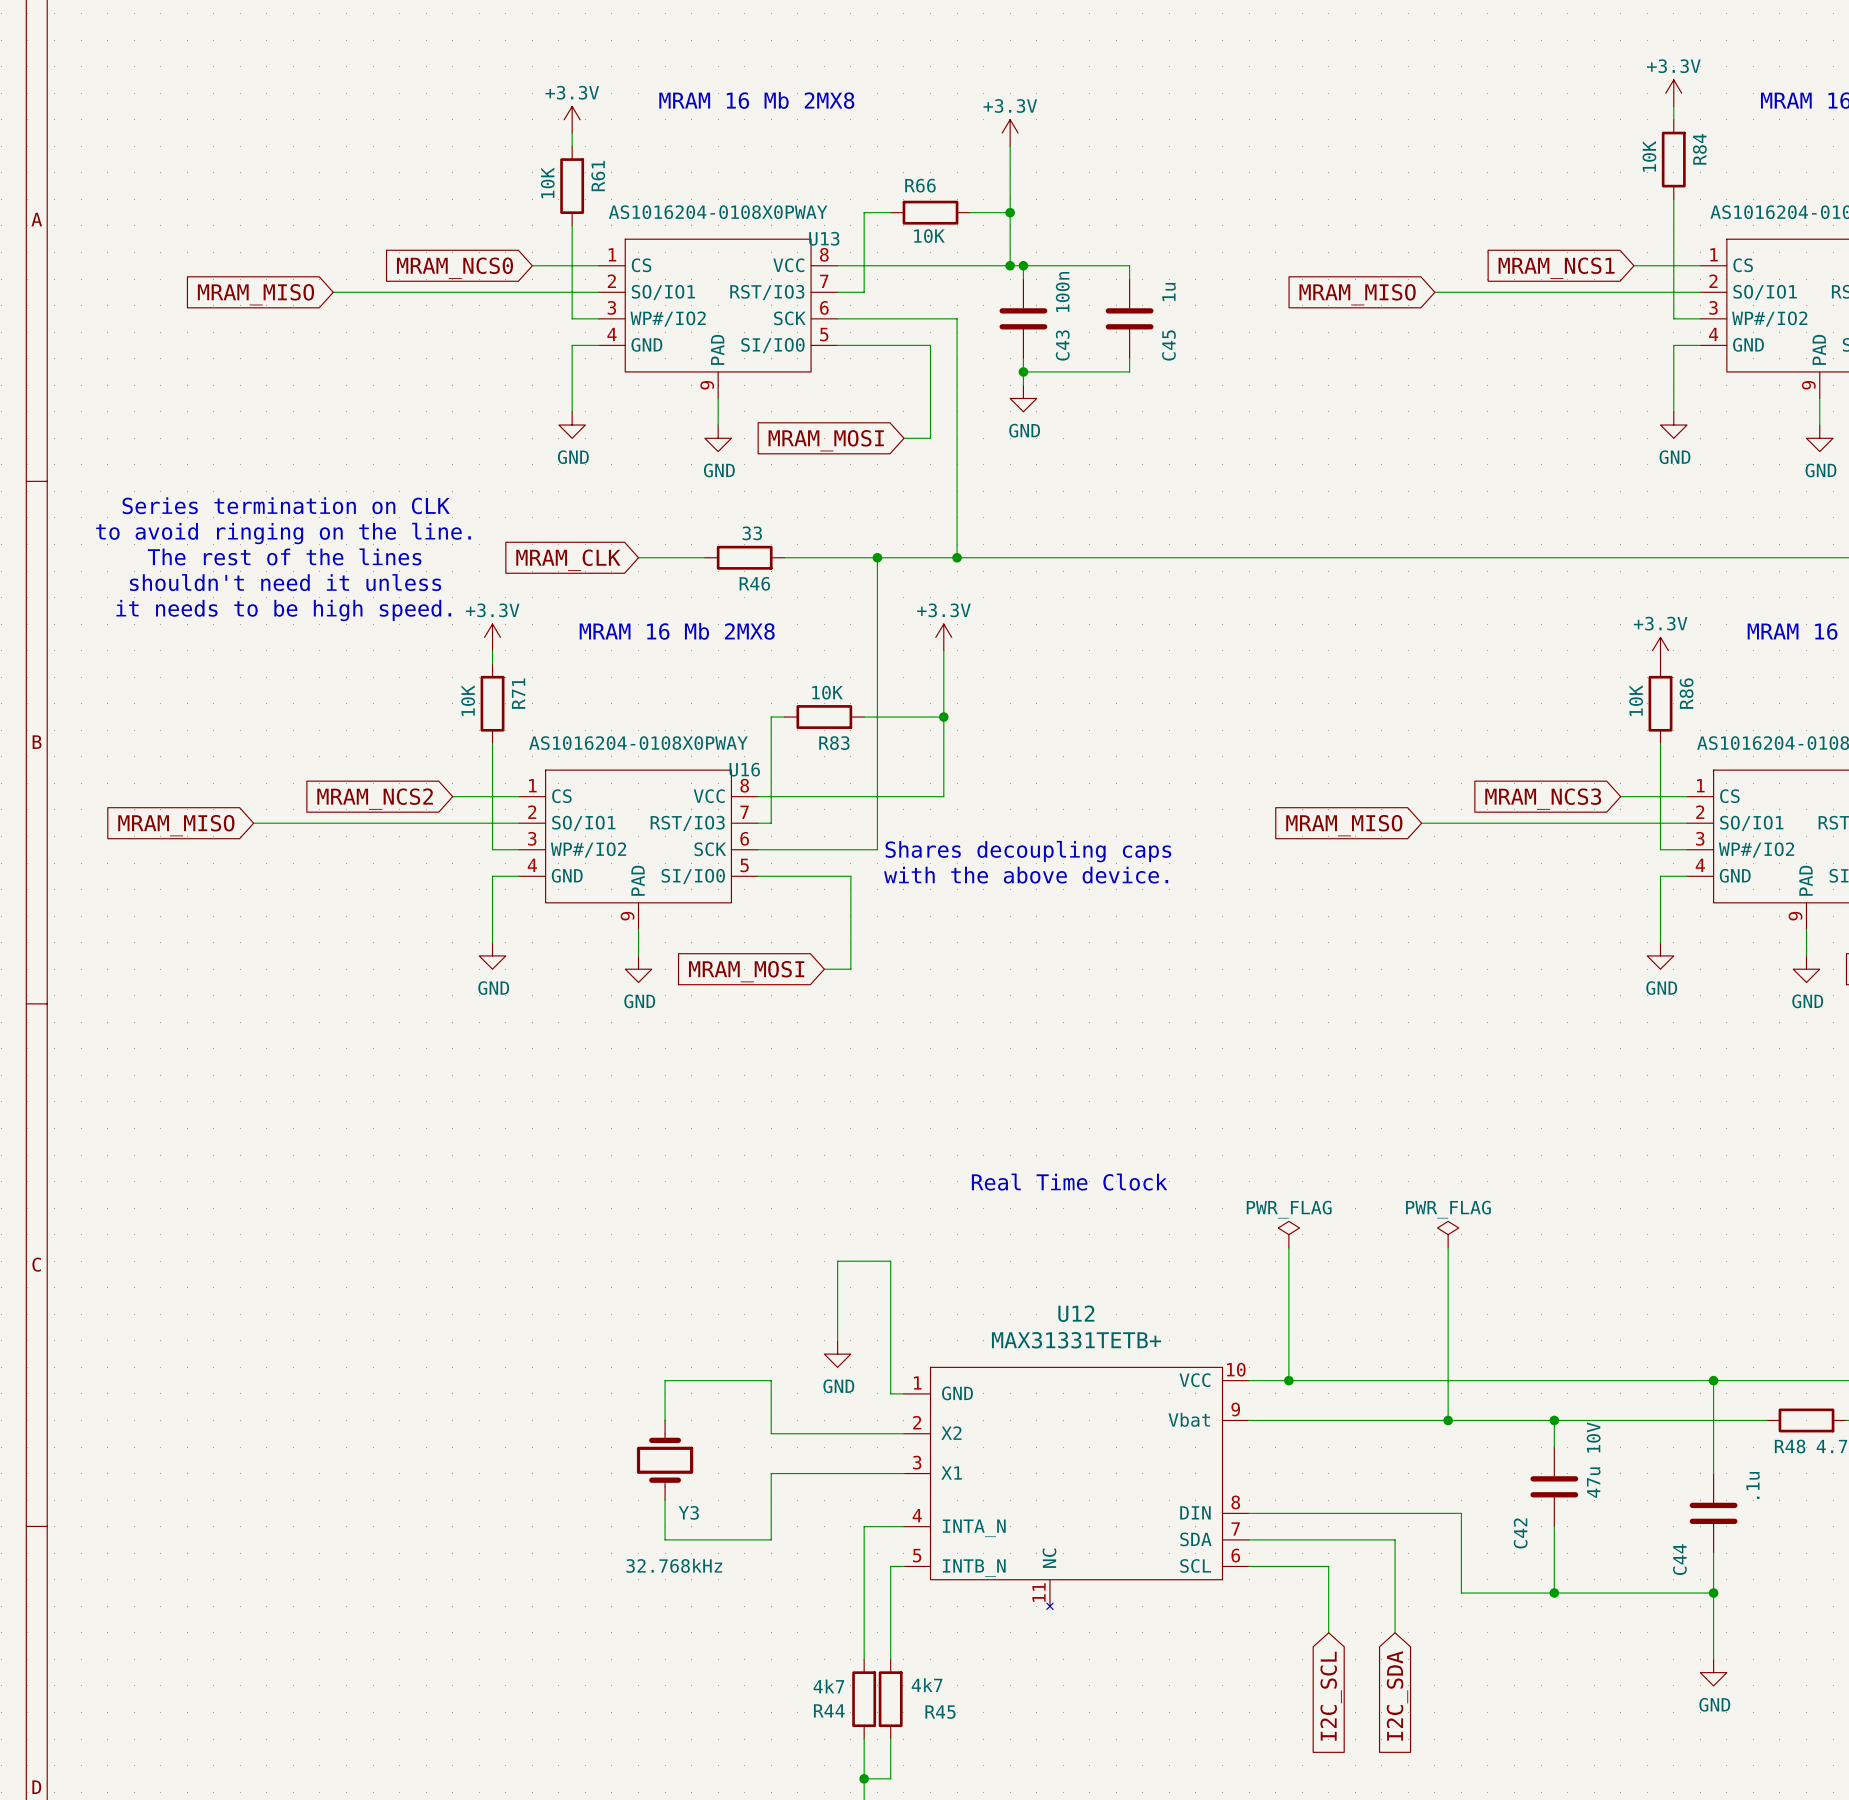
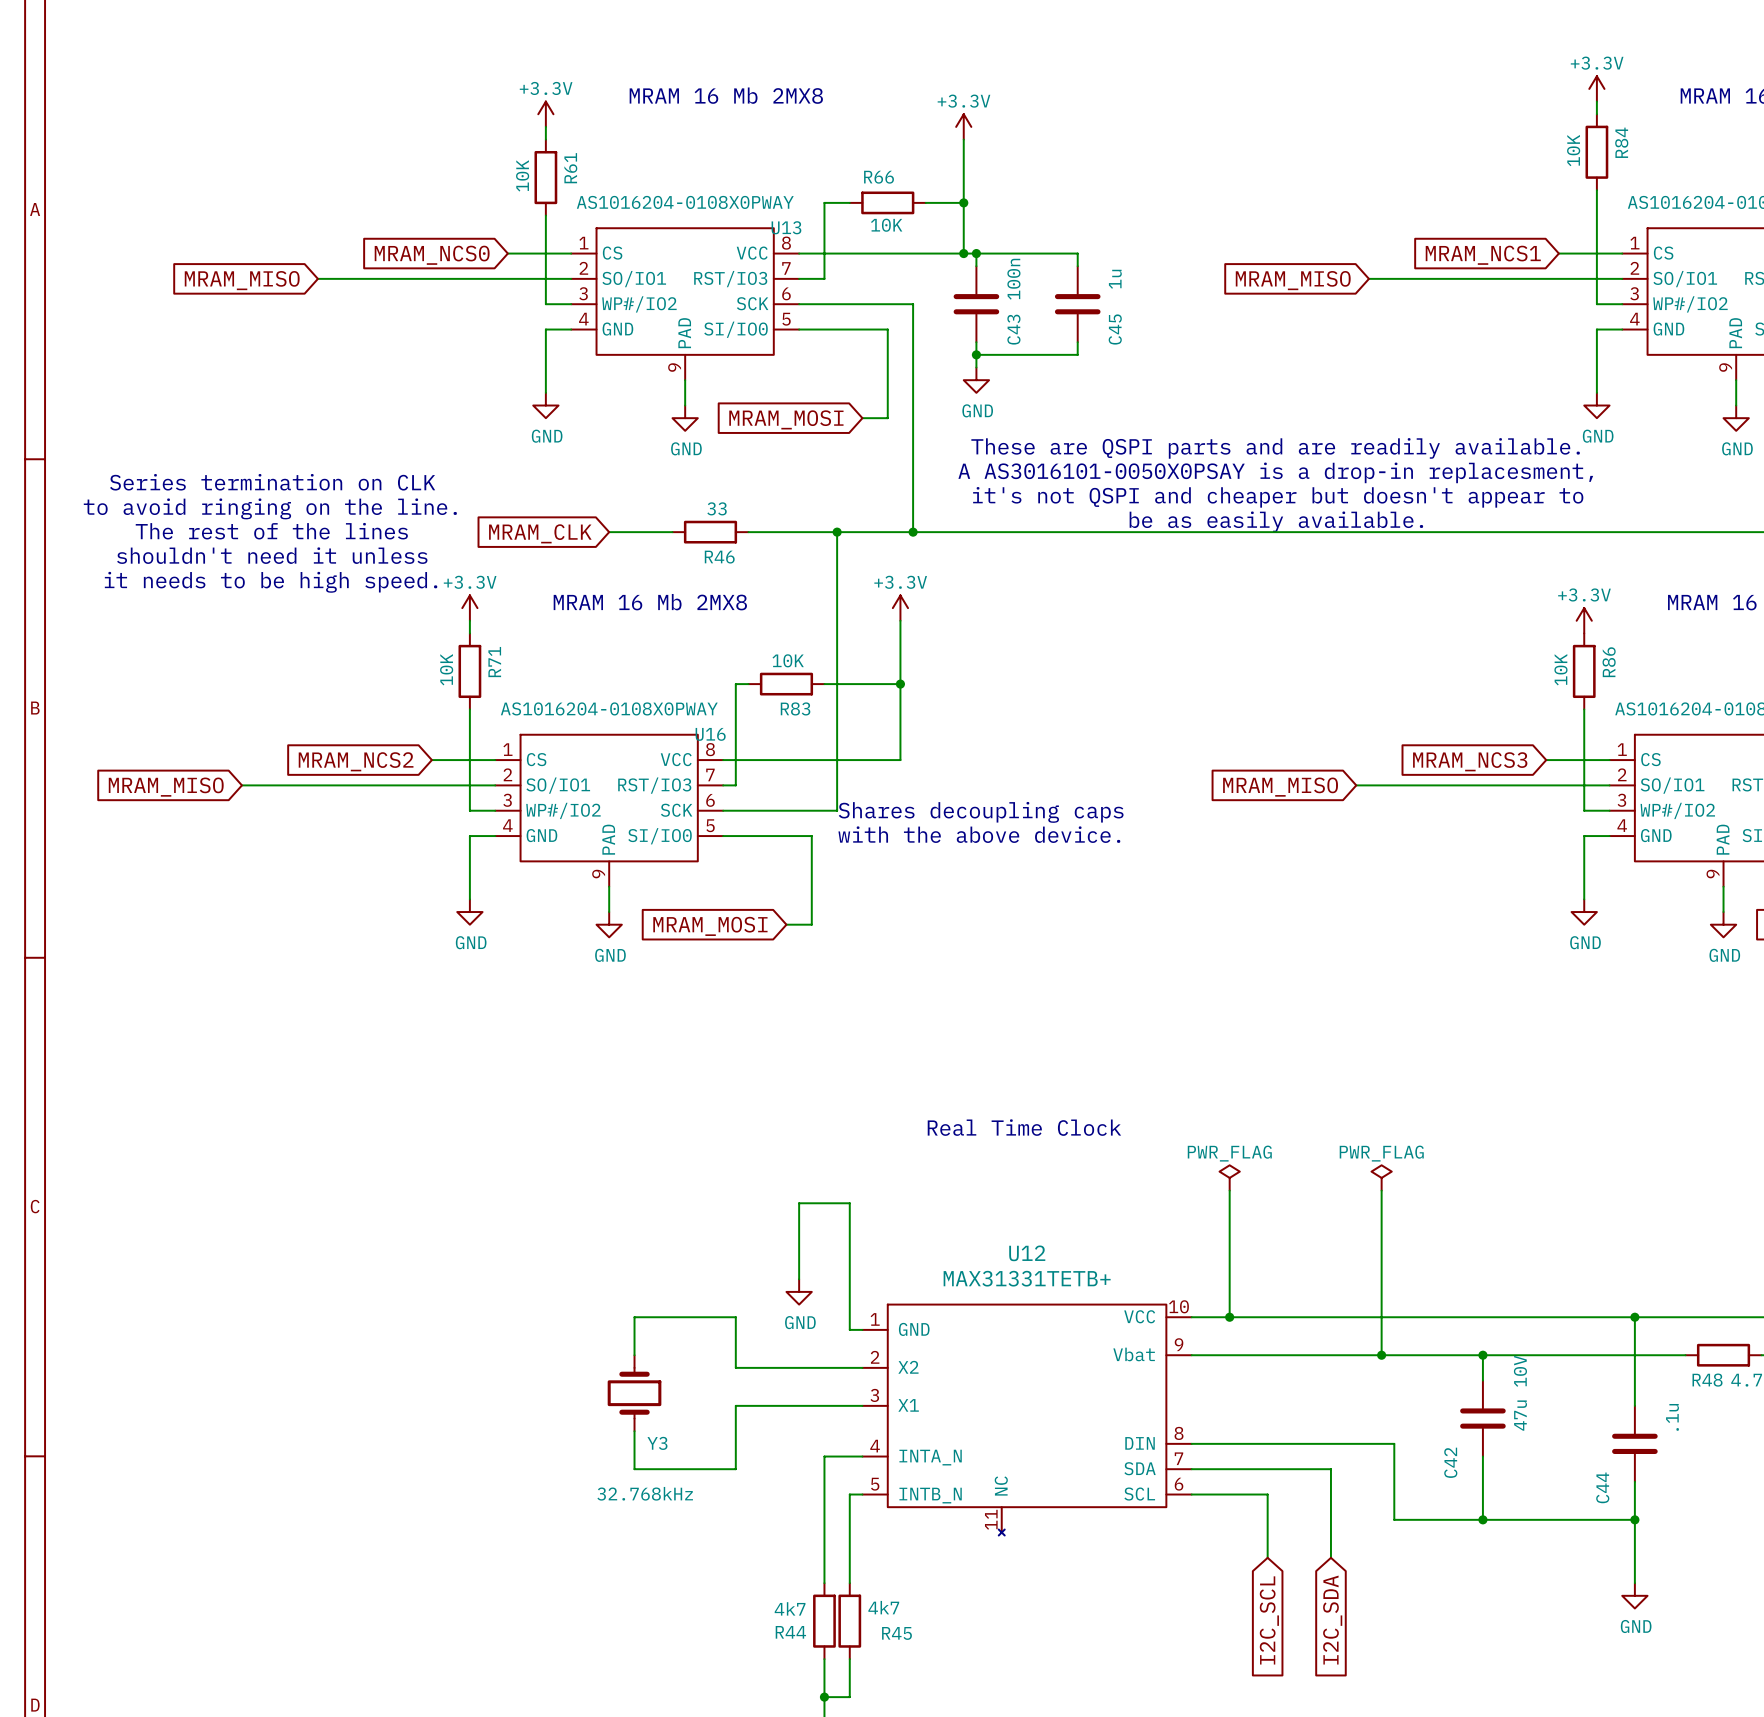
text: none -> These are QSPI parts and are readily available. (1275, 448)
text: none -> A AS3016101-0050X0PSAY is a drop-in replacesment, (1275, 472)
text: none -> it's not QSPI and cheaper but doesn't appear to (1278, 497)
text: none -> be as easily available. (1276, 521)

